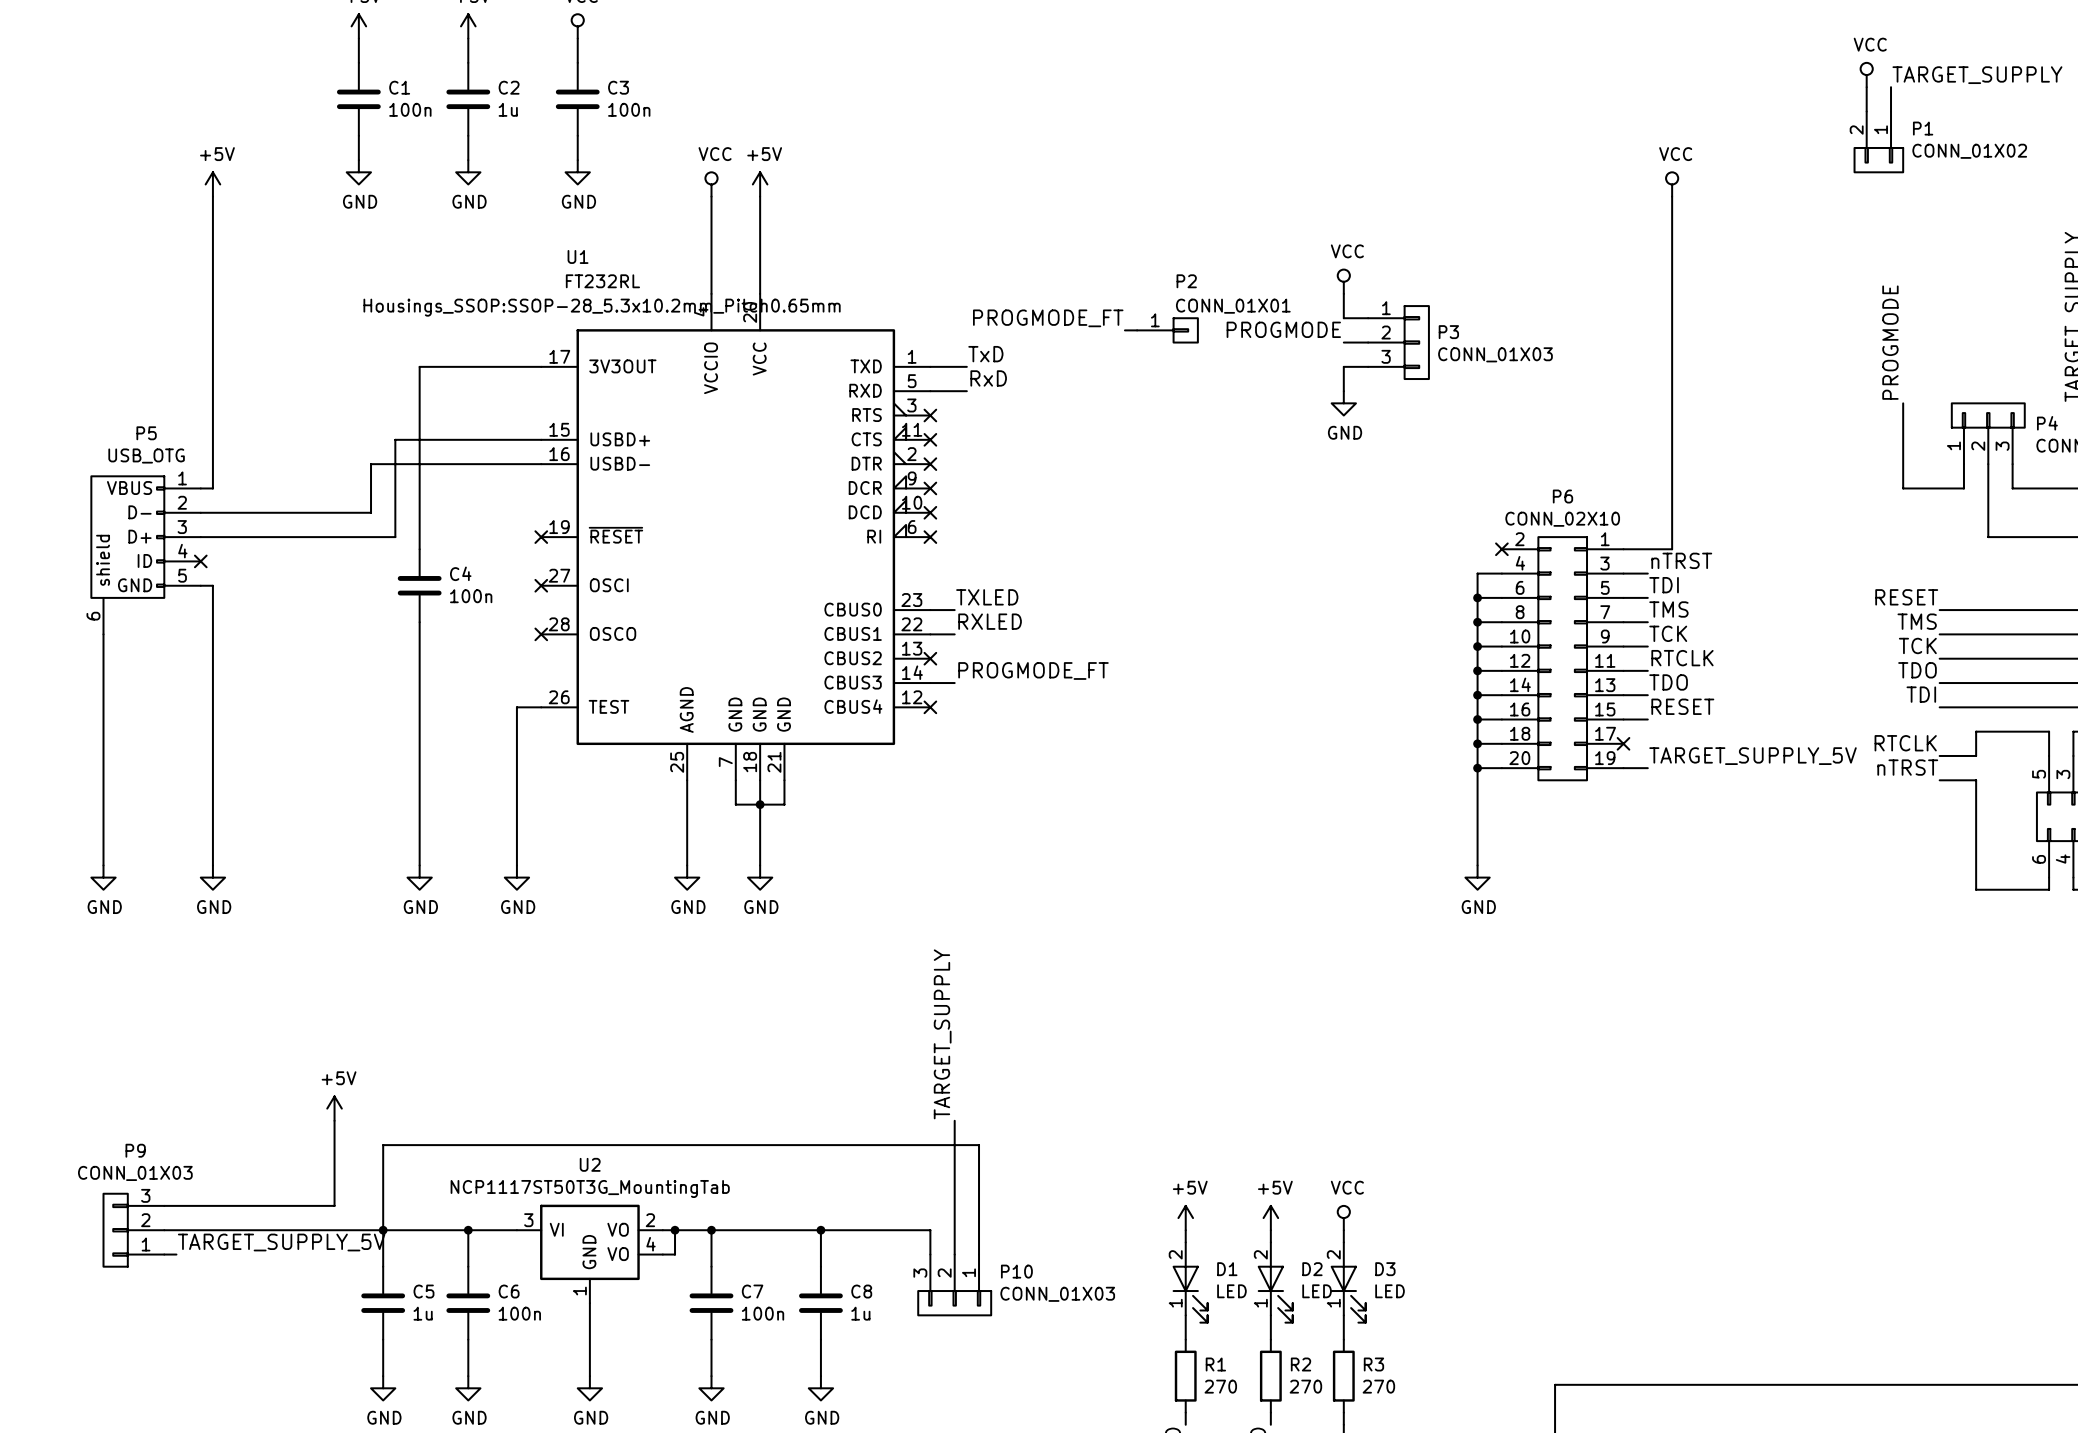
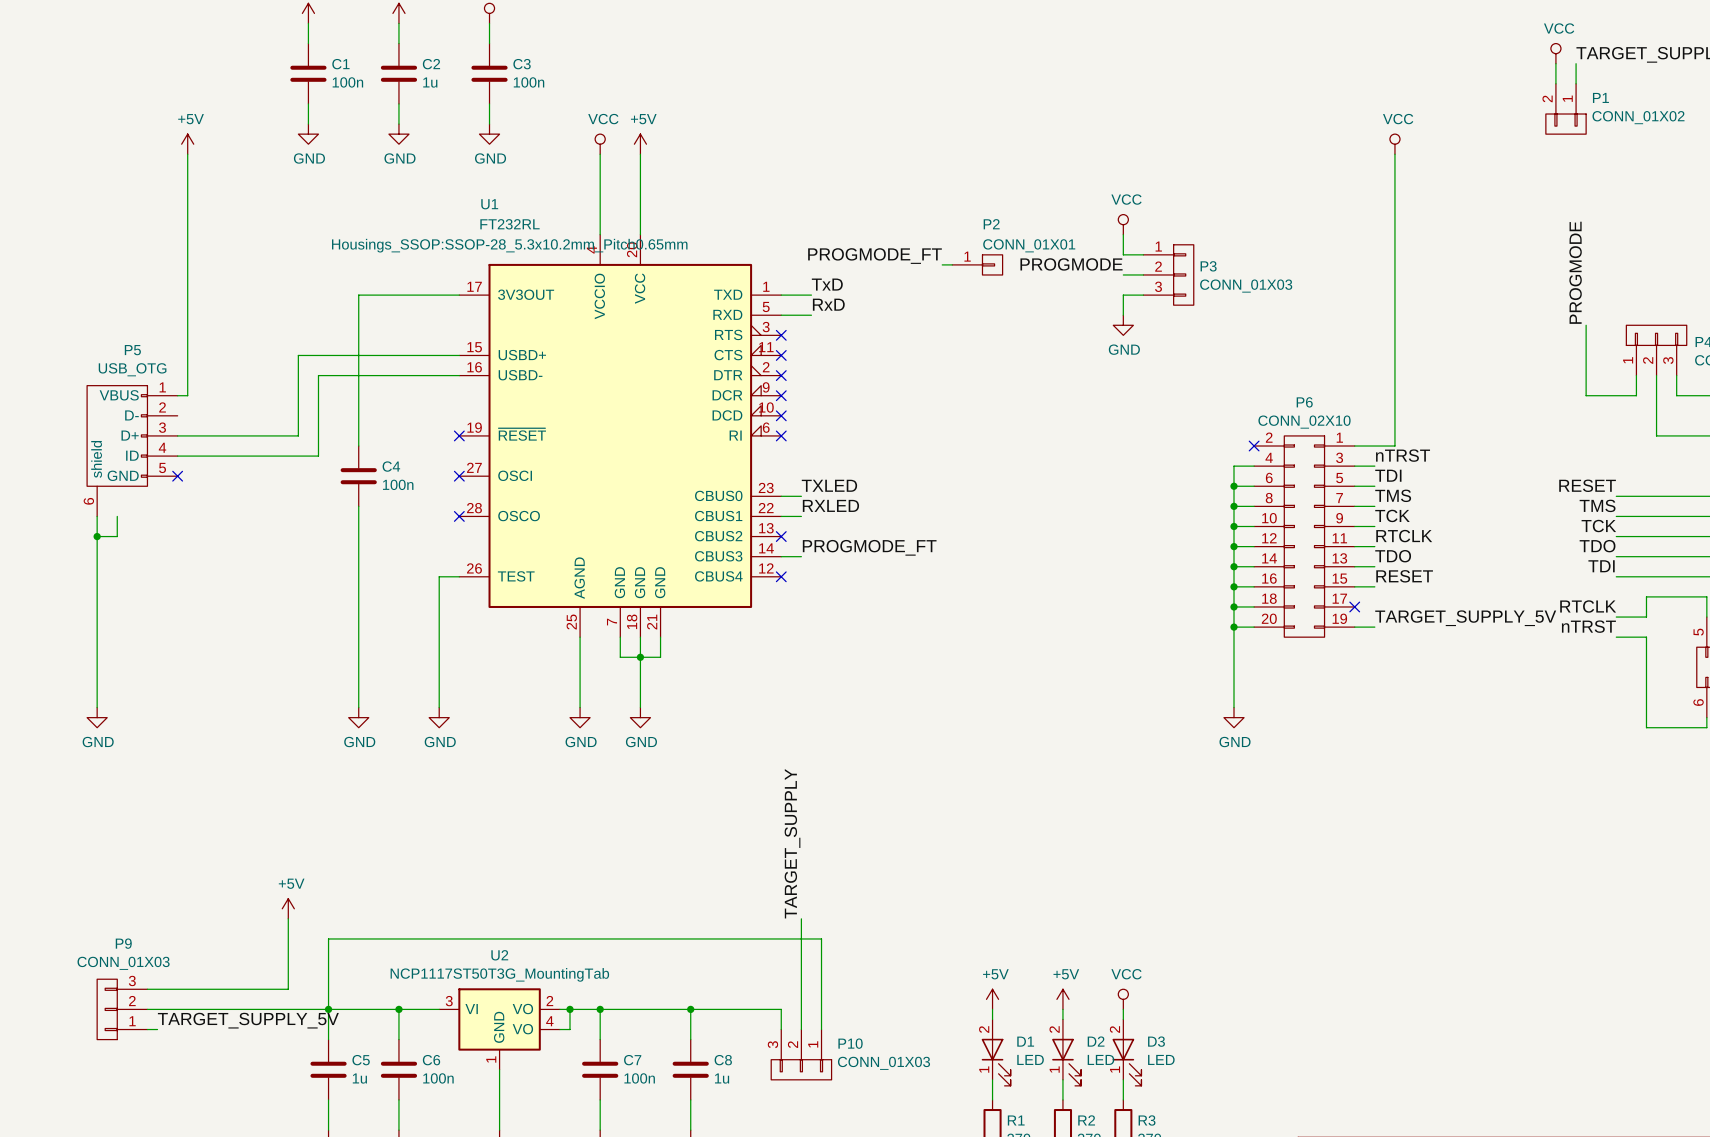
wire: (395, 439) (395, 537) (346, 537) -> (338, 355) (298, 355) (298, 435)
wire: (200, 512) (371, 512) -> (177, 456) (318, 456) (318, 415)
no-connect mark position: (200, 561) -> (177, 476)
wire: (200, 585) (212, 585) (212, 865) -> none
wire: none -> (117, 516) (117, 536) (97, 536)
junction: none -> (97, 536)
power symbol: GND (212, 877) -> none

